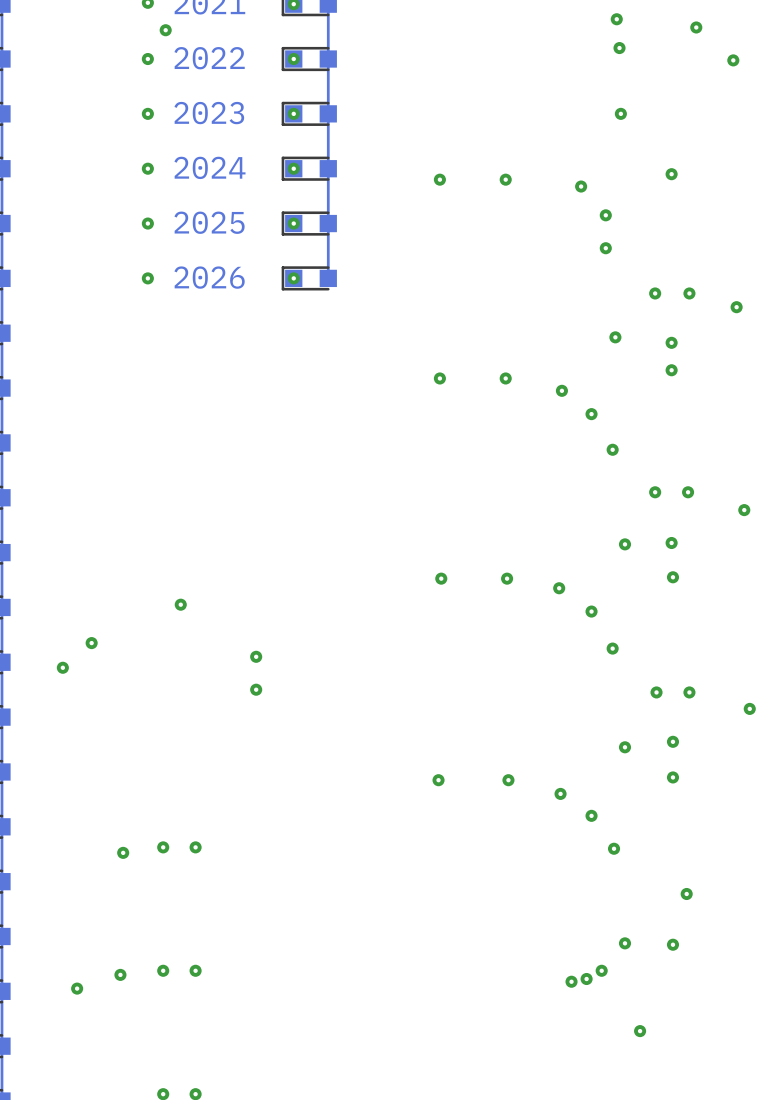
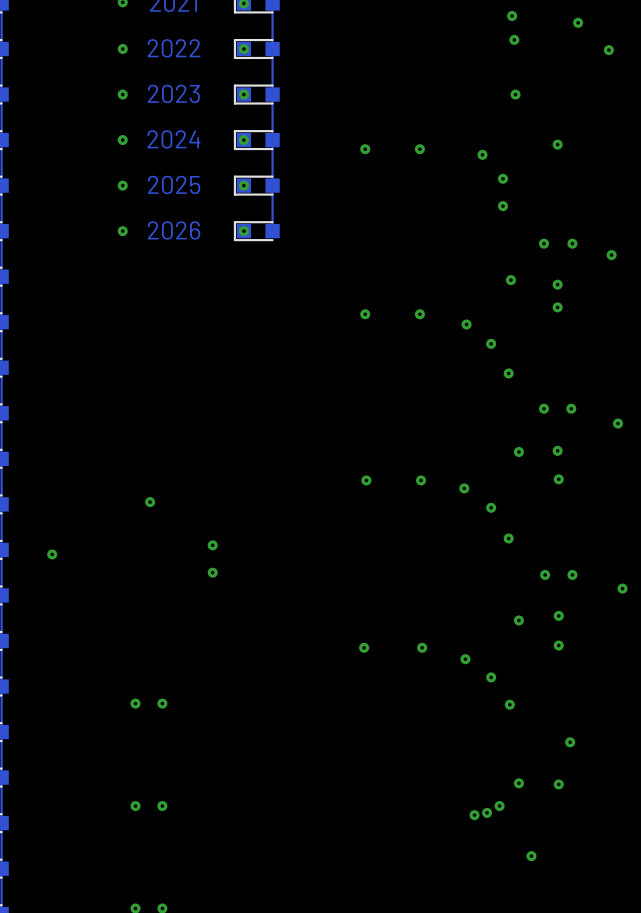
via: (165, 30) -> none
via: (91, 643) -> none
via: (123, 852) -> none
via: (120, 974) -> none
via: (77, 988) -> none

